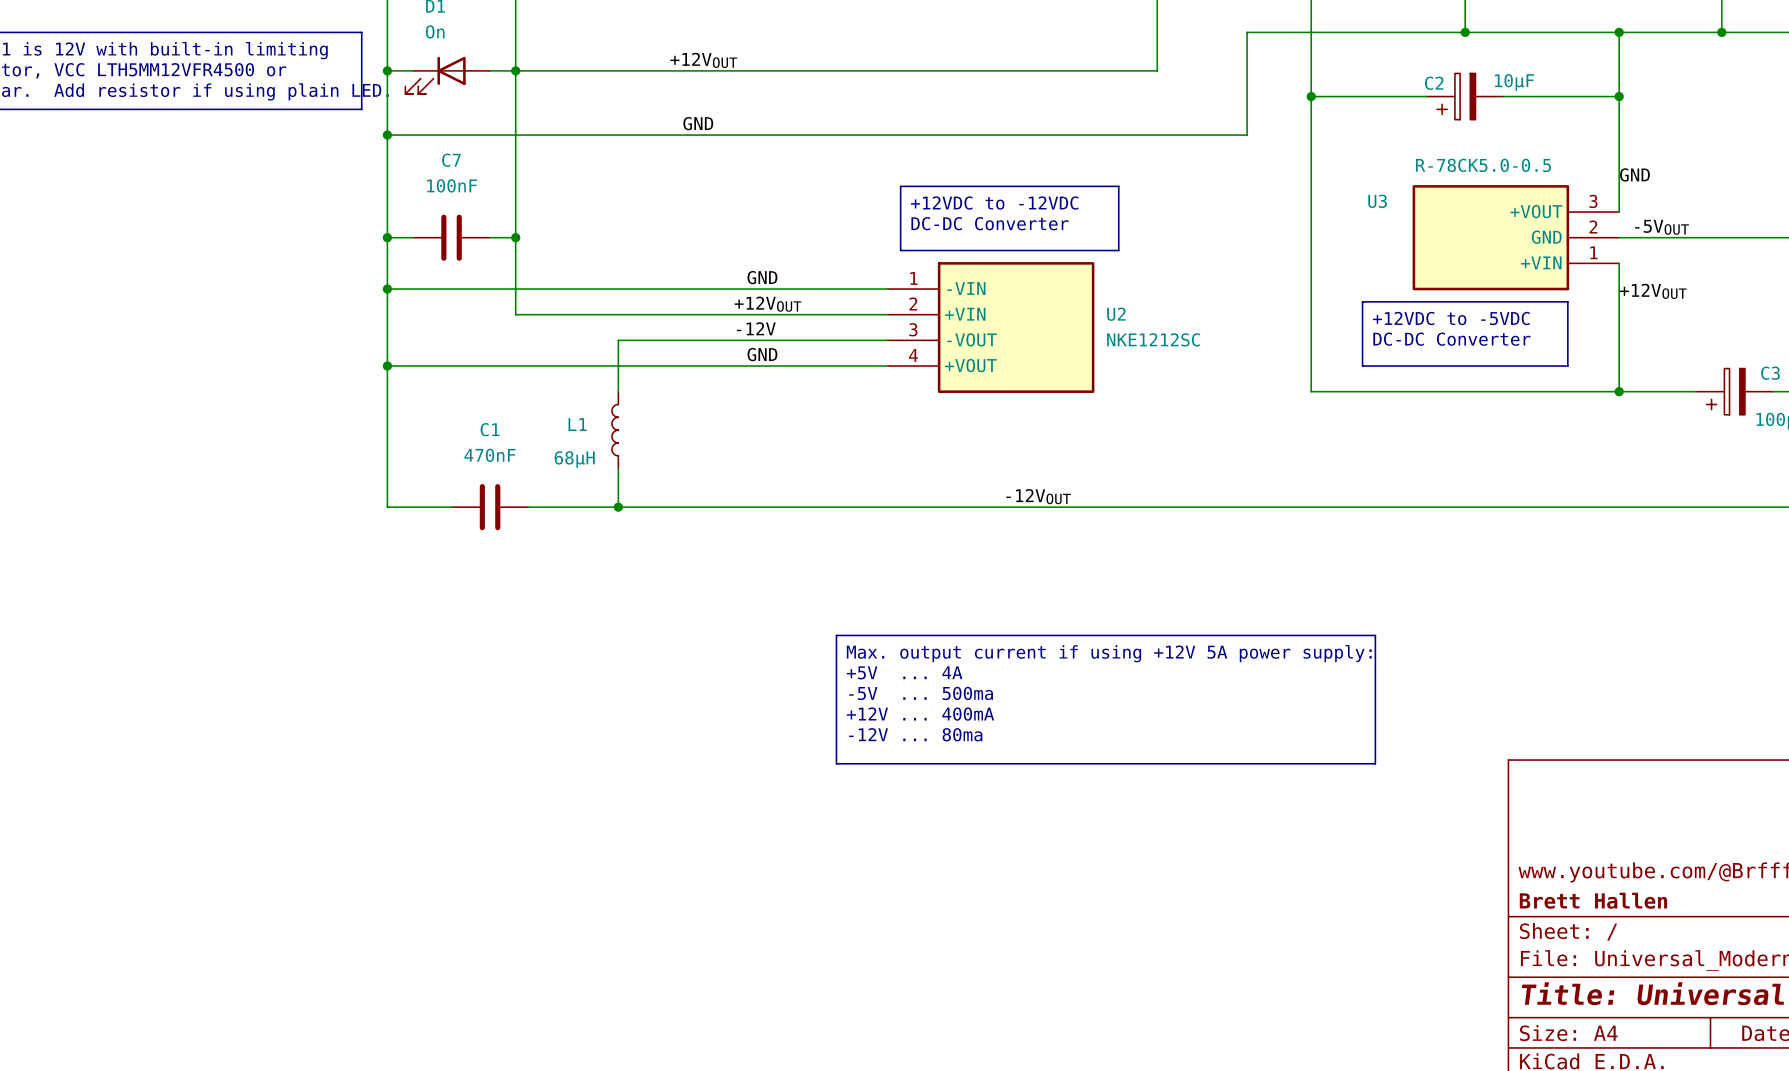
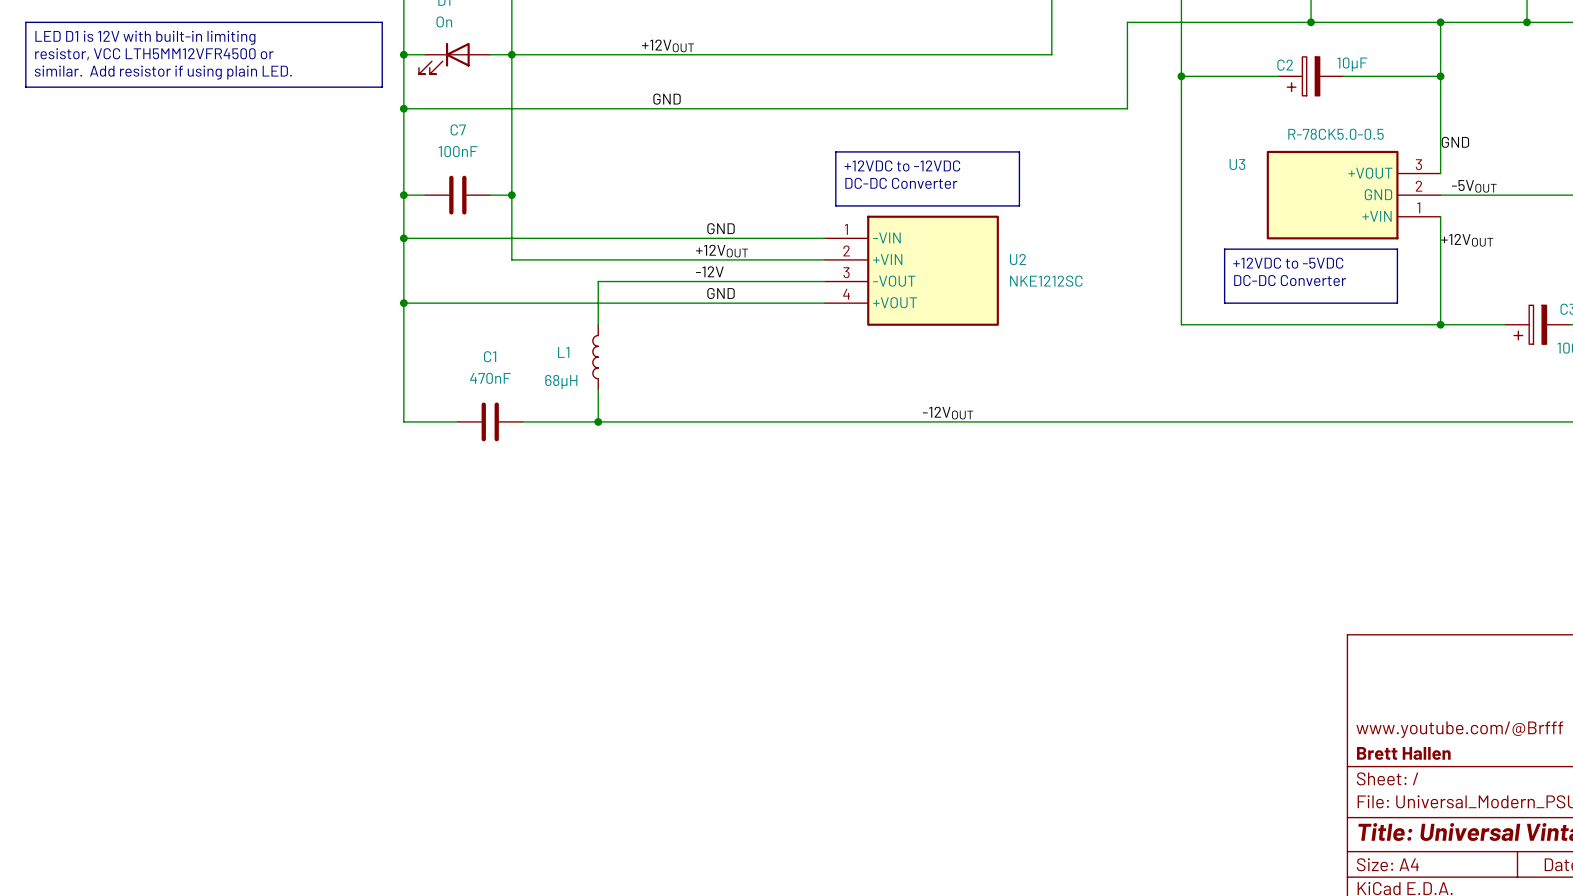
line: (836, 635) (1375, 635) (1375, 763) (836, 763) (836, 635) -> none
text: Max. output current if using +12V 5A power supply: (1109, 653) -> none
text: +5V ... 4A (904, 672) -> none
text: -5V ... 500ma (921, 693) -> none
text: +12V ... 400mA (920, 714) -> none
text: -12V ... 80ma (915, 734) -> none

